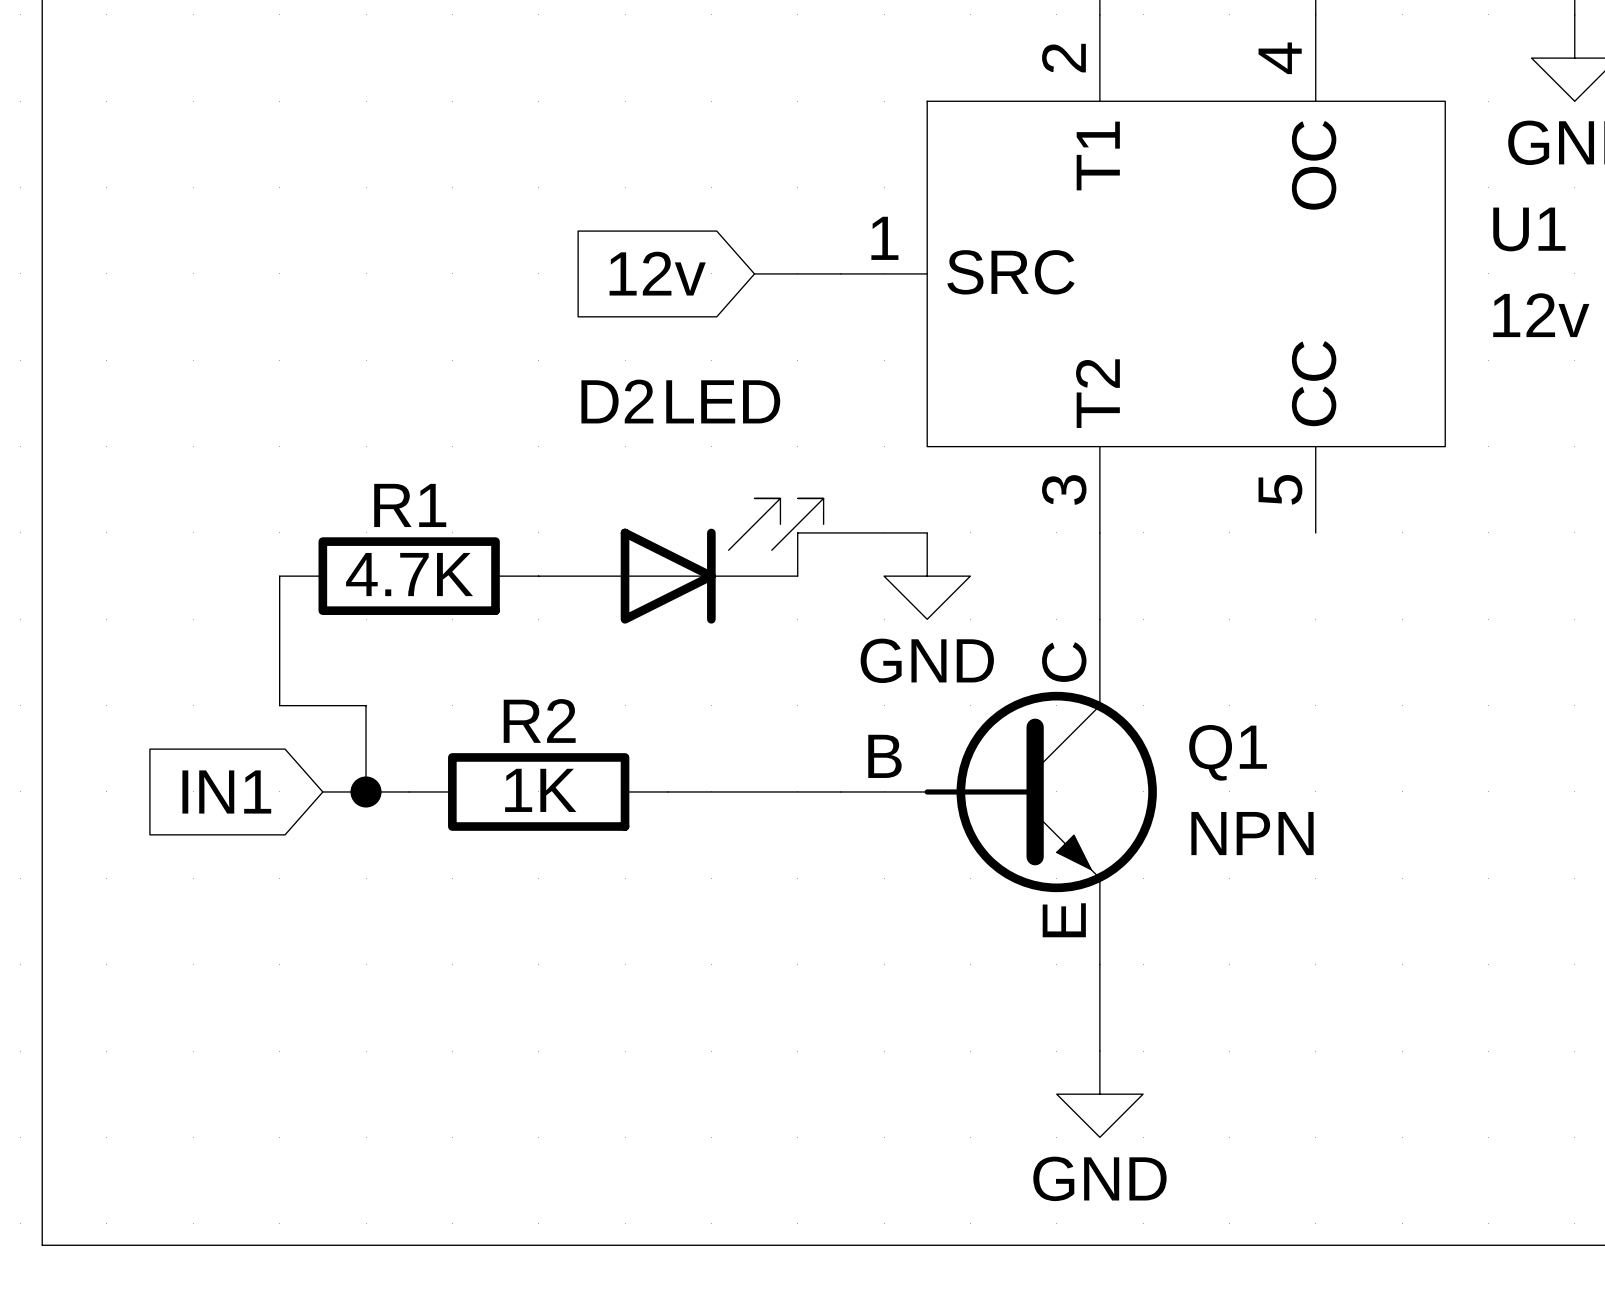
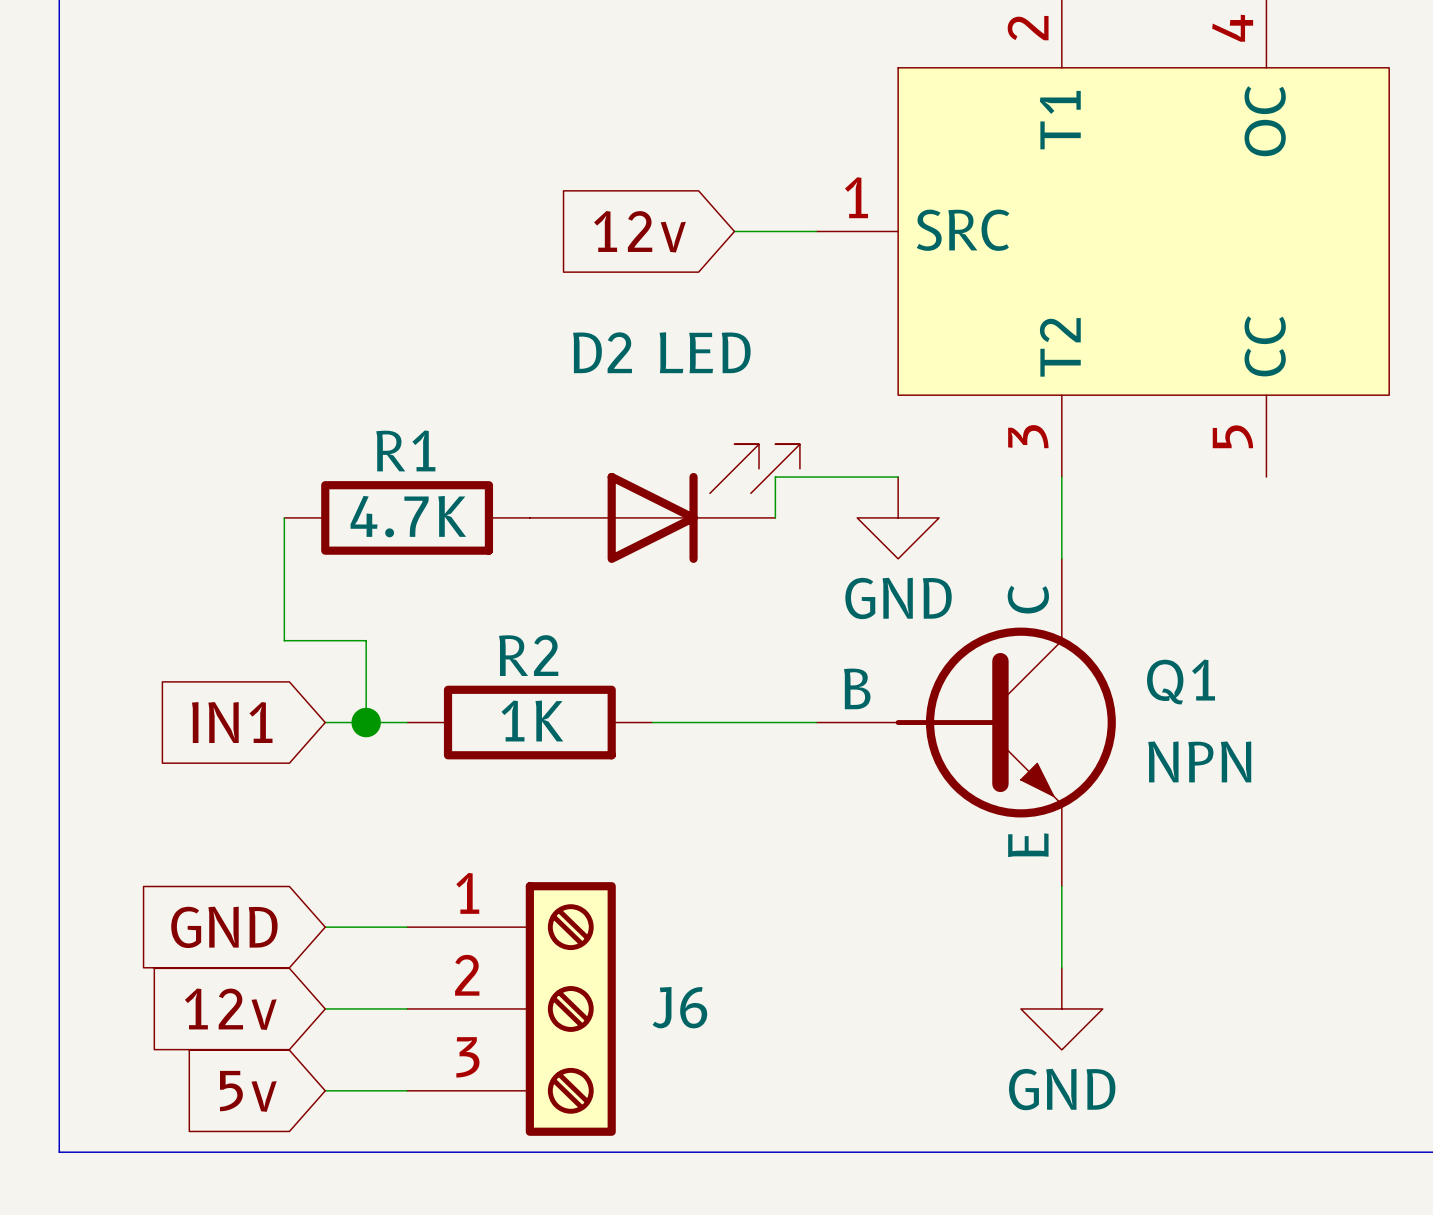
global label: none -> GND (224, 927)
wire: none -> (325, 927) (407, 927)
global label: none -> 12v (230, 1009)
wire: none -> (325, 1008) (407, 1008)
J6: none -> (511, 1008)
global label: none -> 5v (248, 1091)
wire: none -> (325, 1090) (407, 1090)

